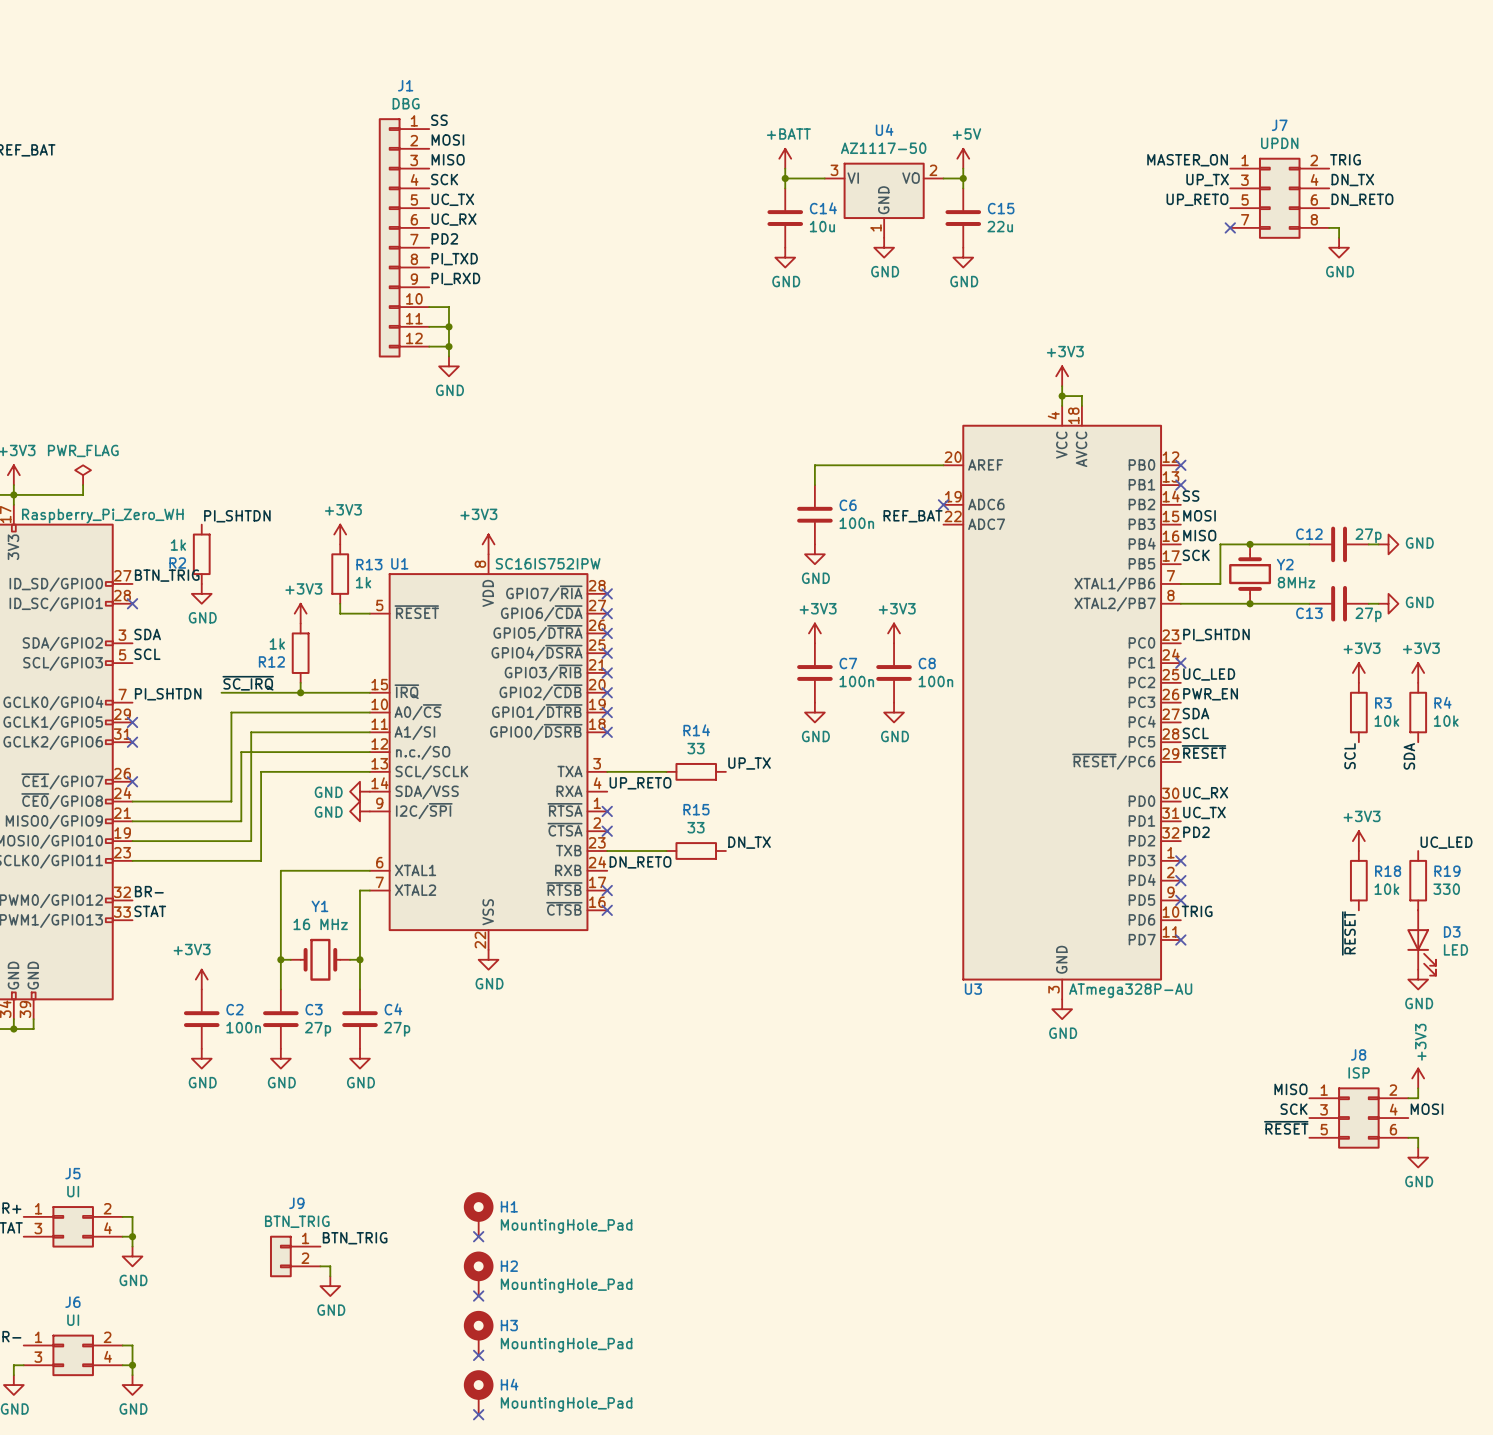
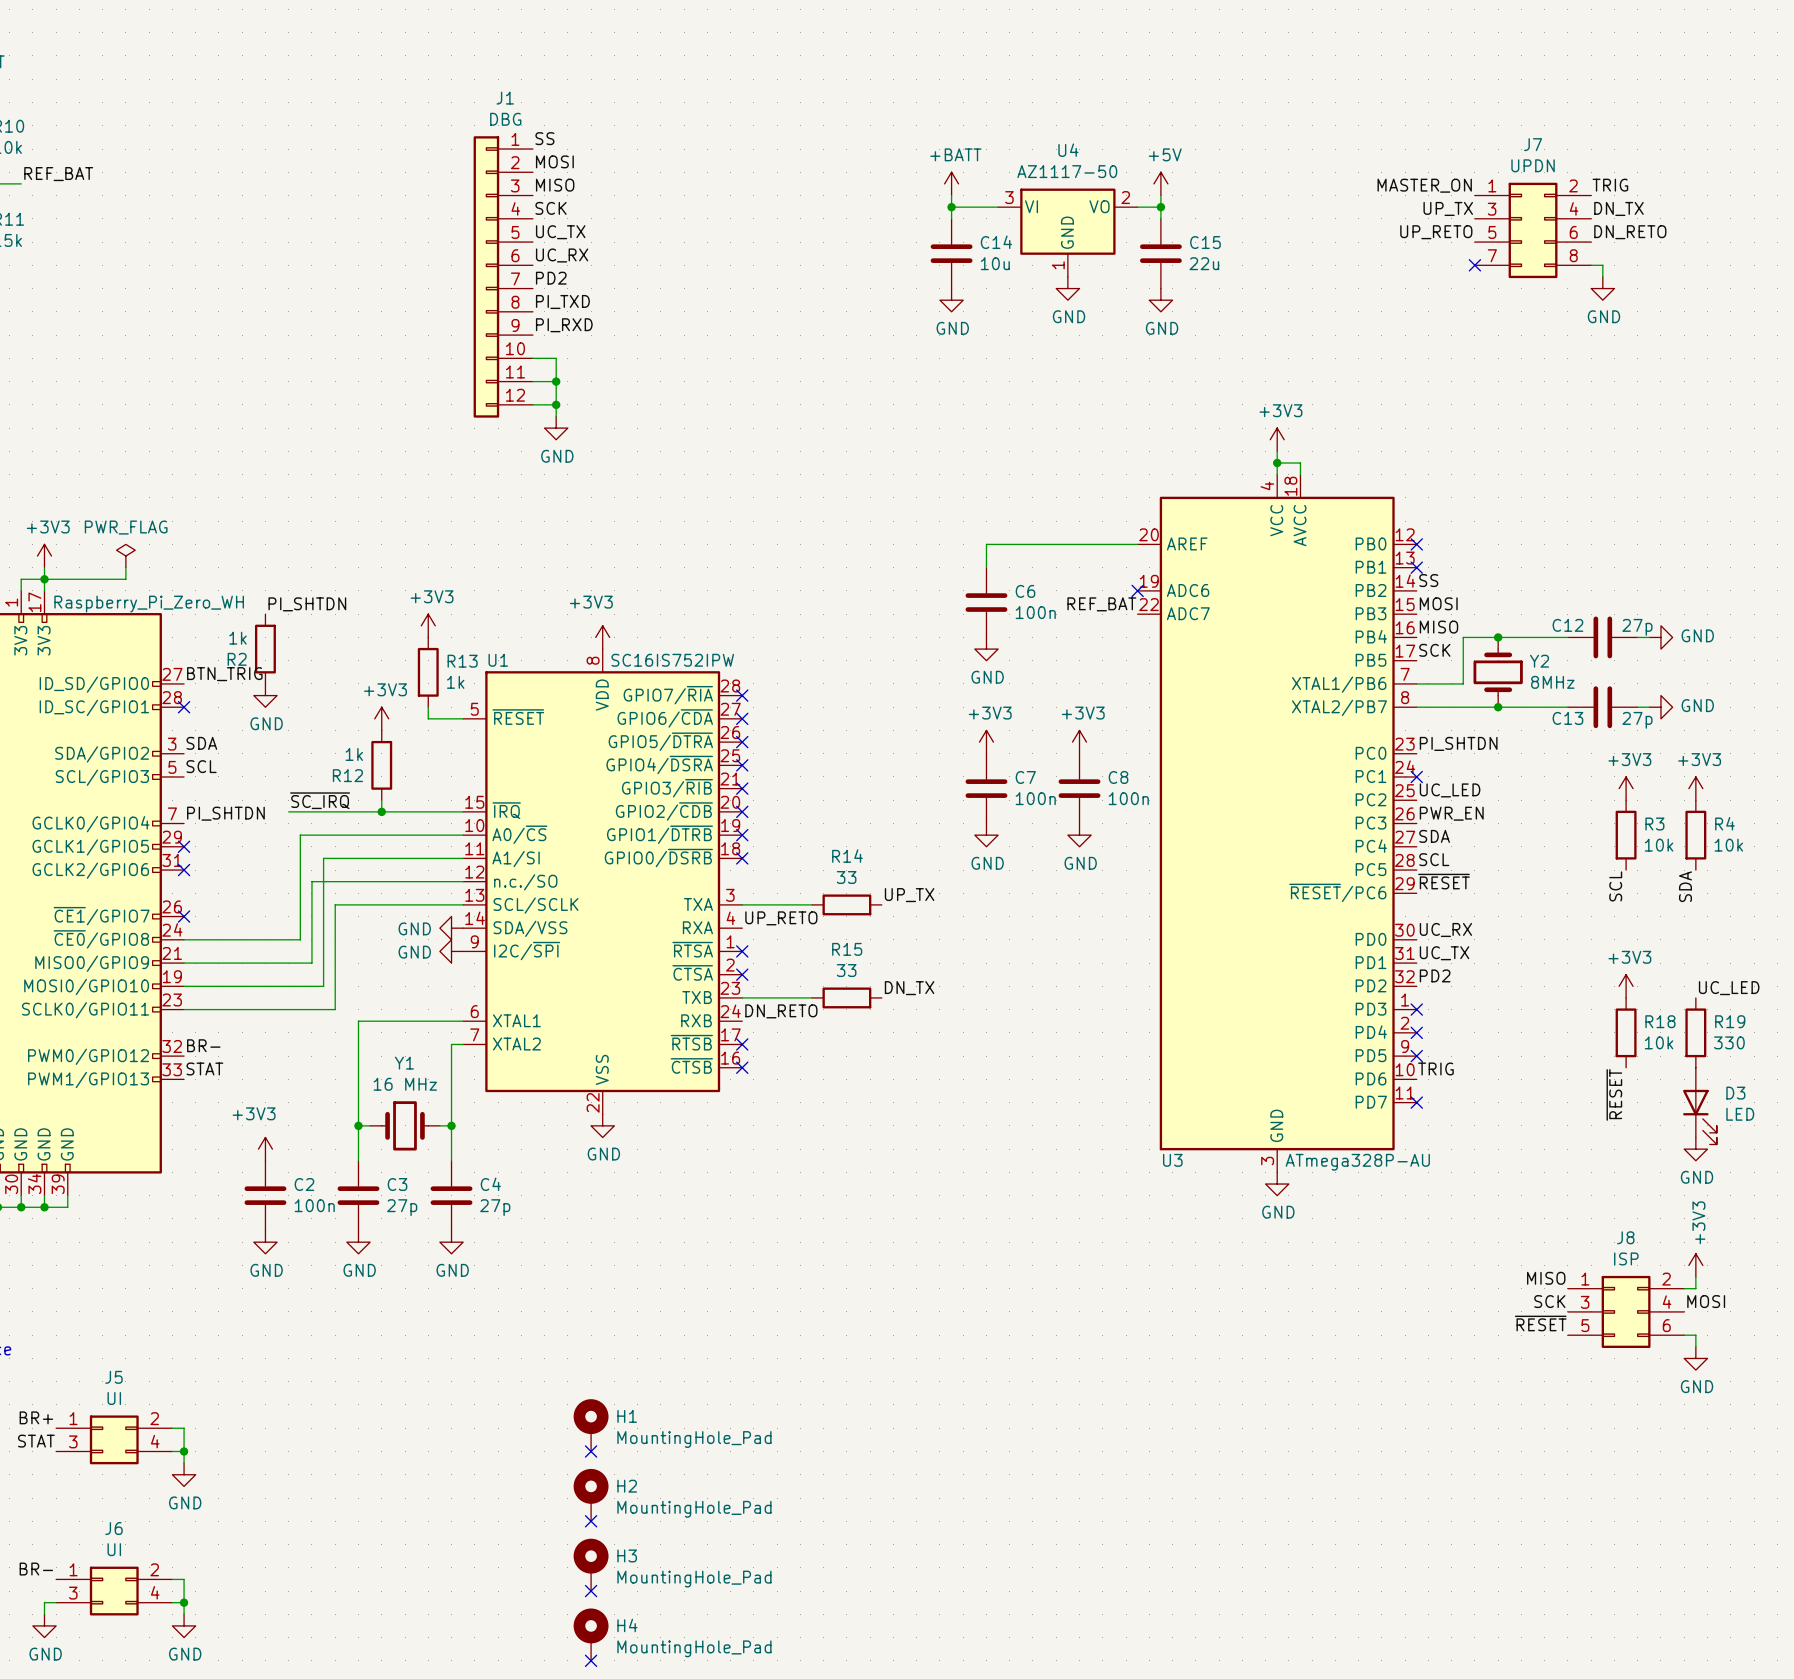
label: BTN_TRIG (355, 1238) -> none
J9: BTN_TRIG (295, 1256) -> none
wire: (320, 1266) (330, 1266) (330, 1276) -> none
power symbol: GND (330, 1286) -> none

